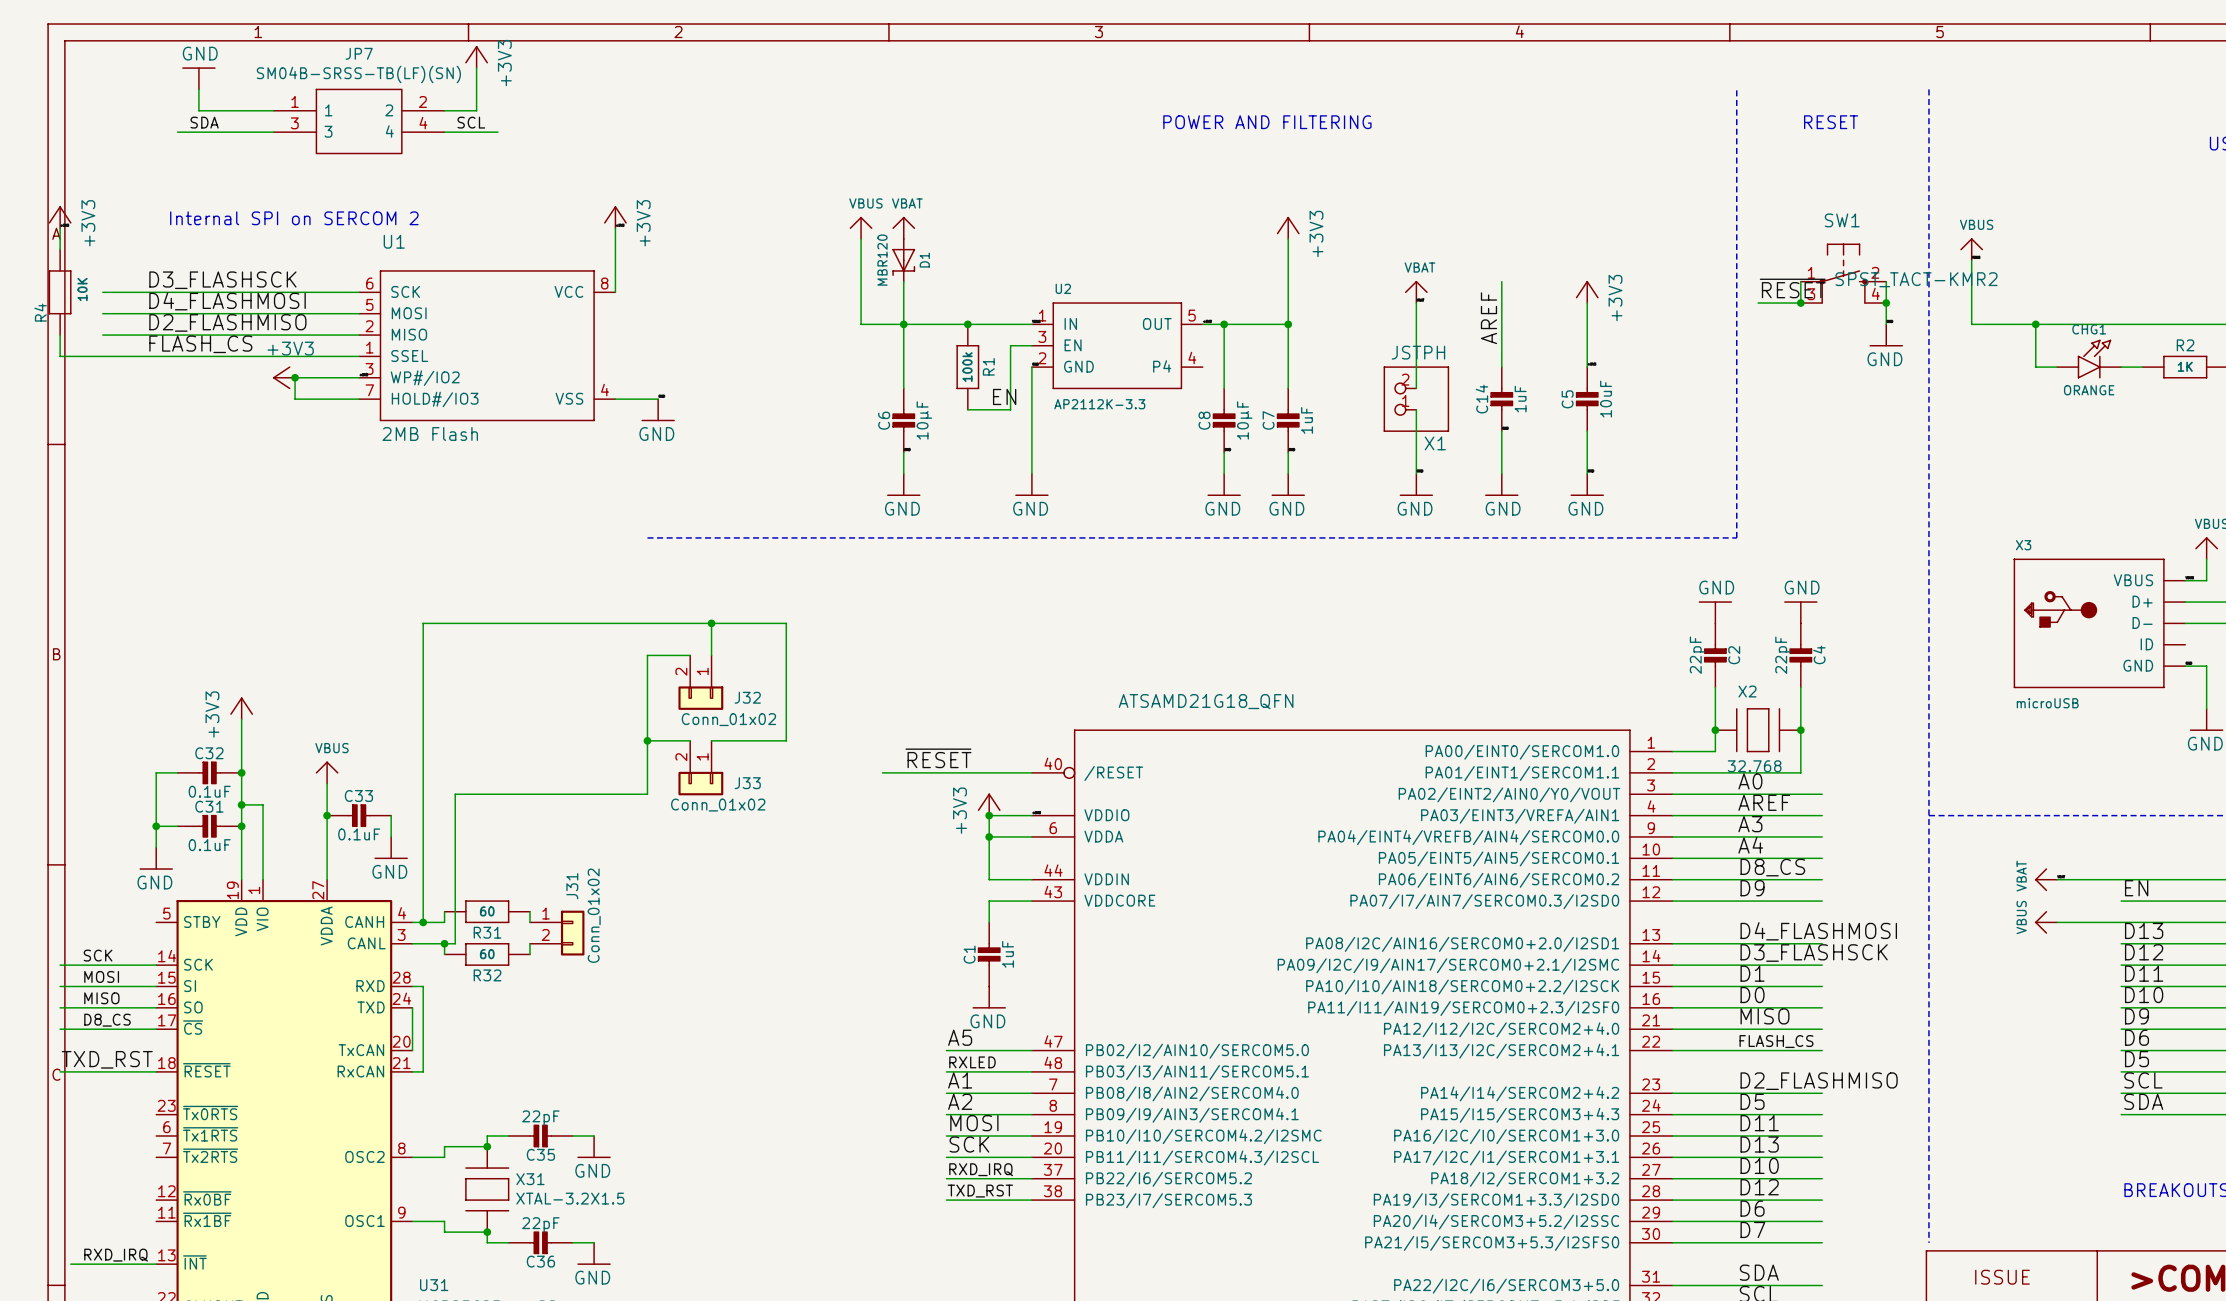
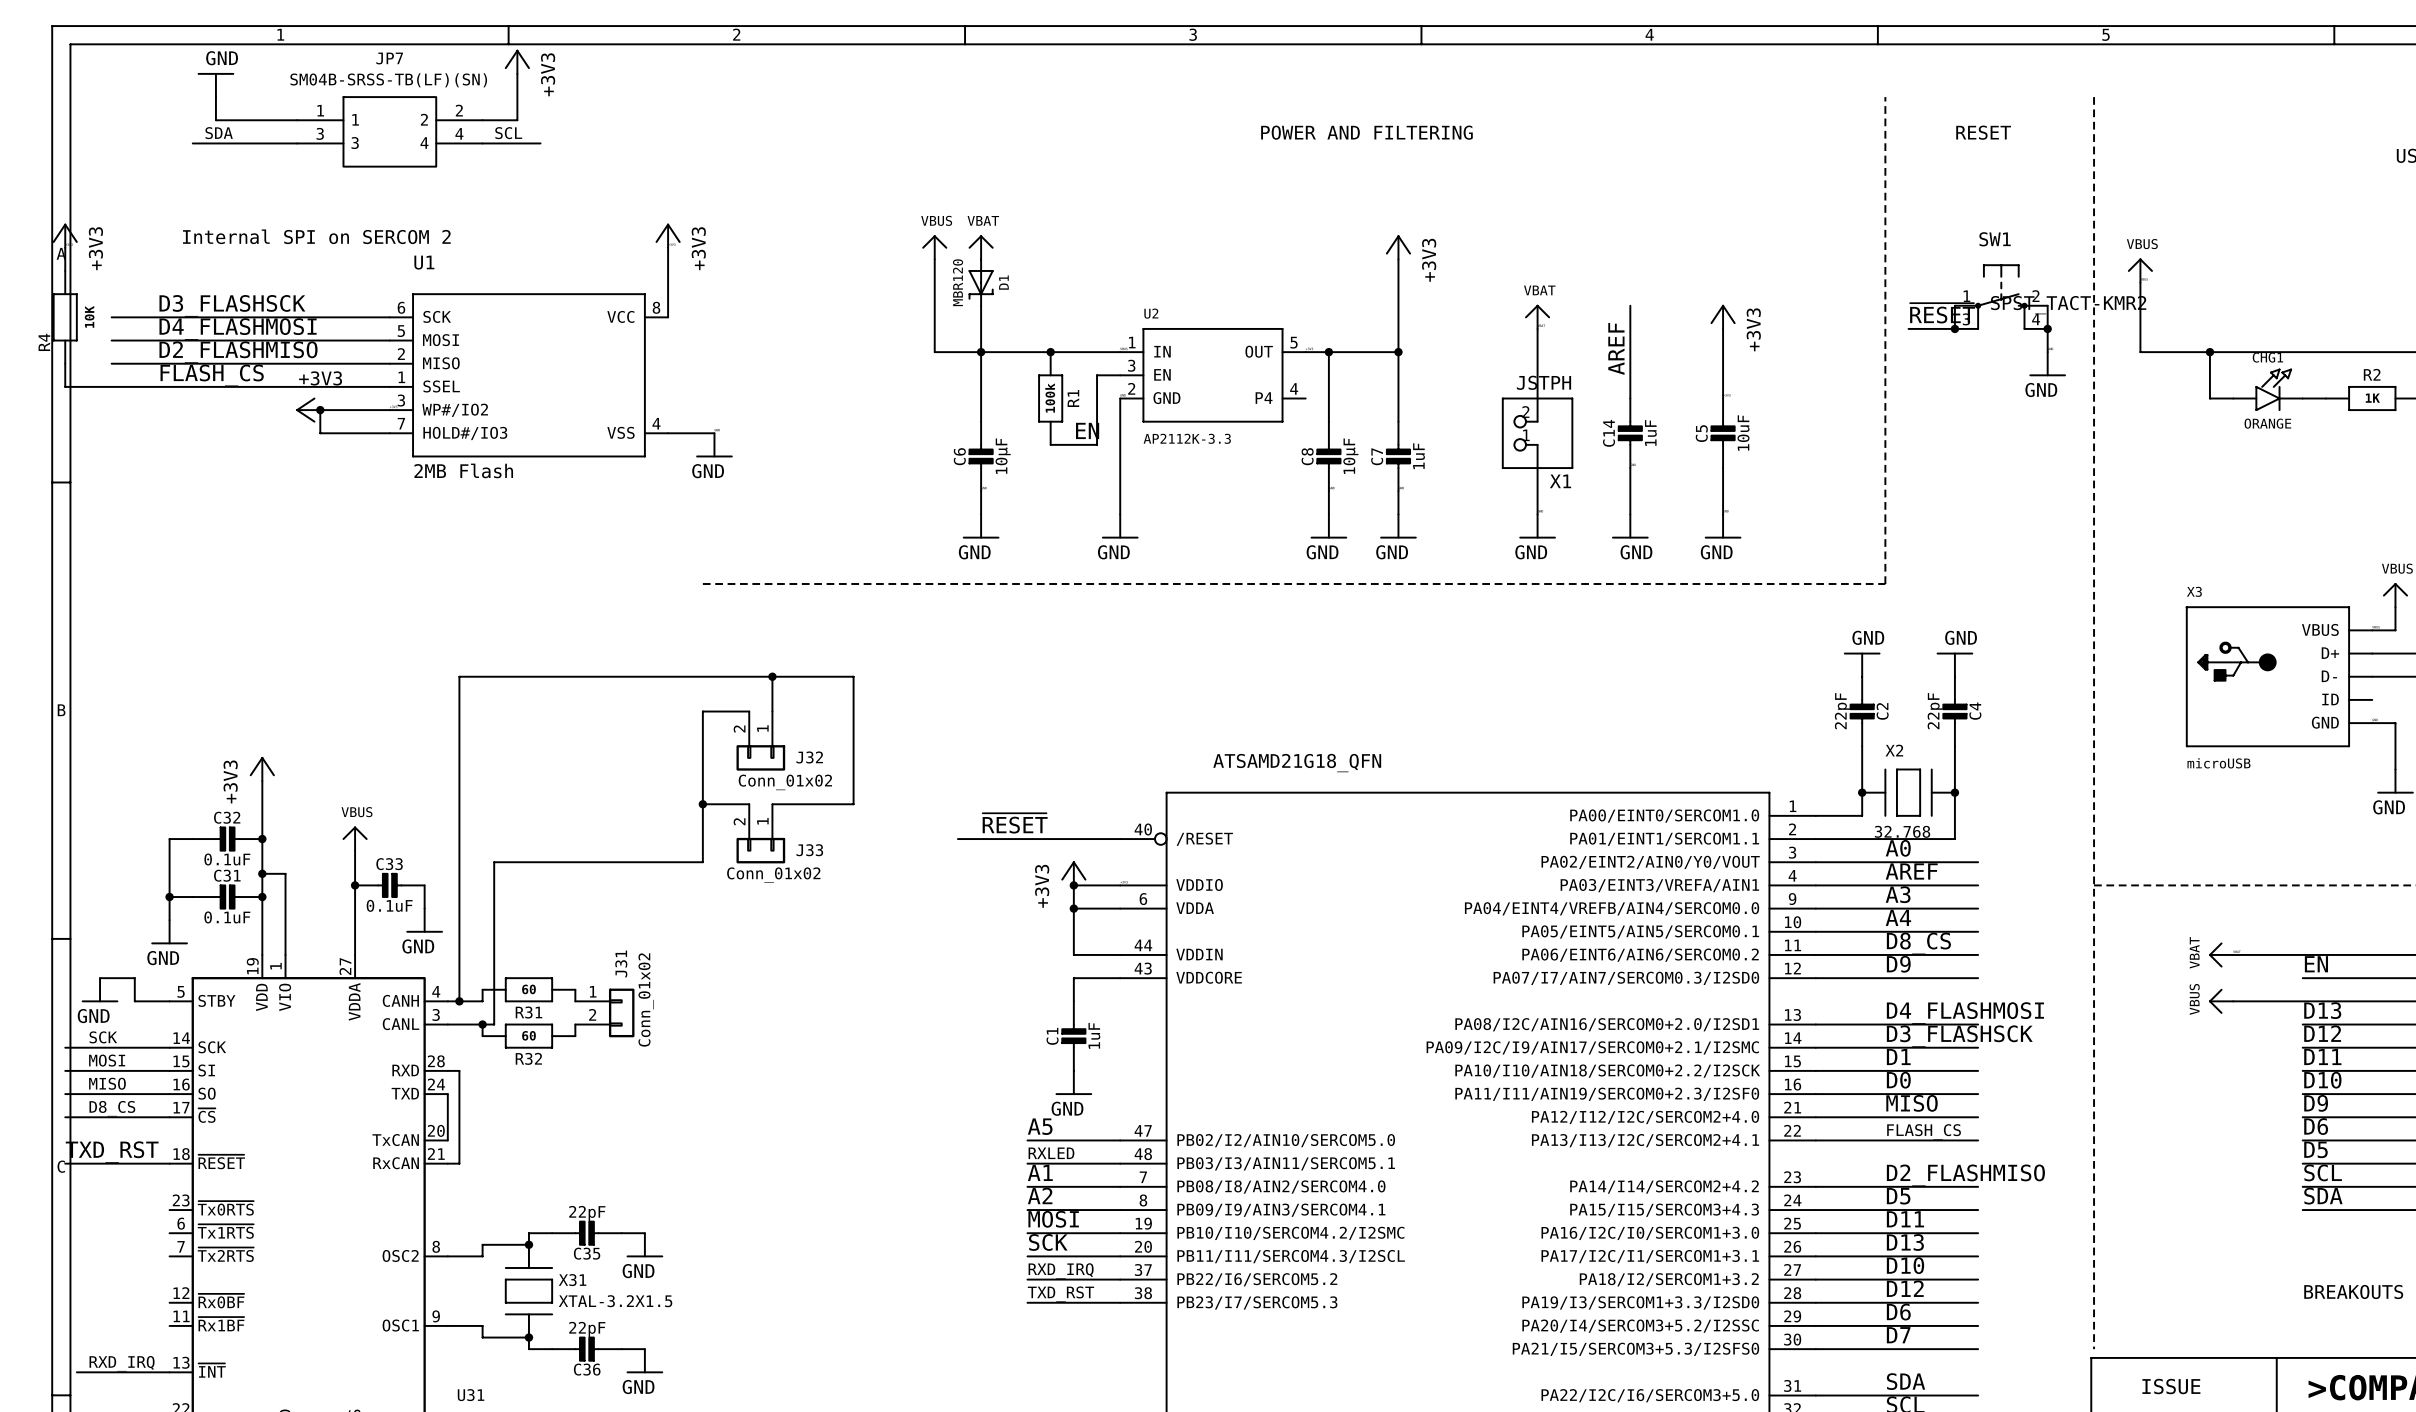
wire: none -> (100, 978) (134, 978) (134, 1001) (169, 1001)
power symbol: none -> GND (100, 989)

